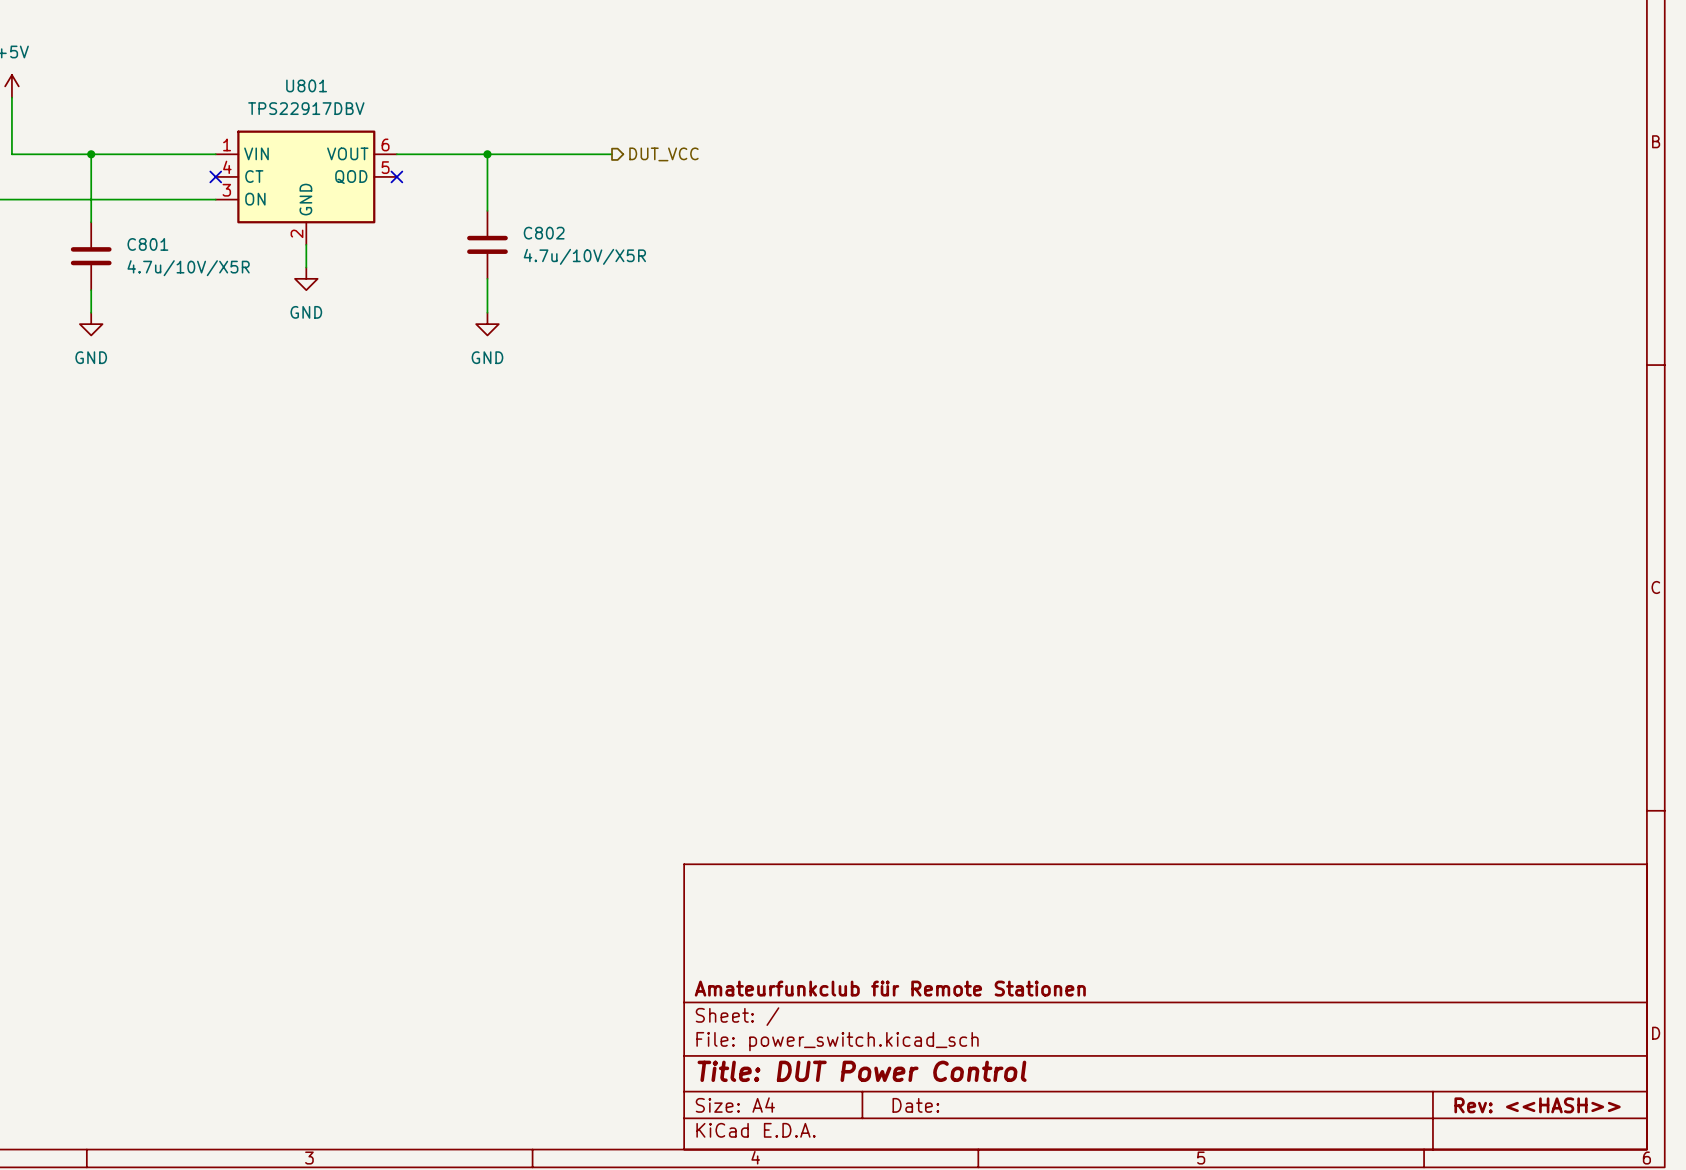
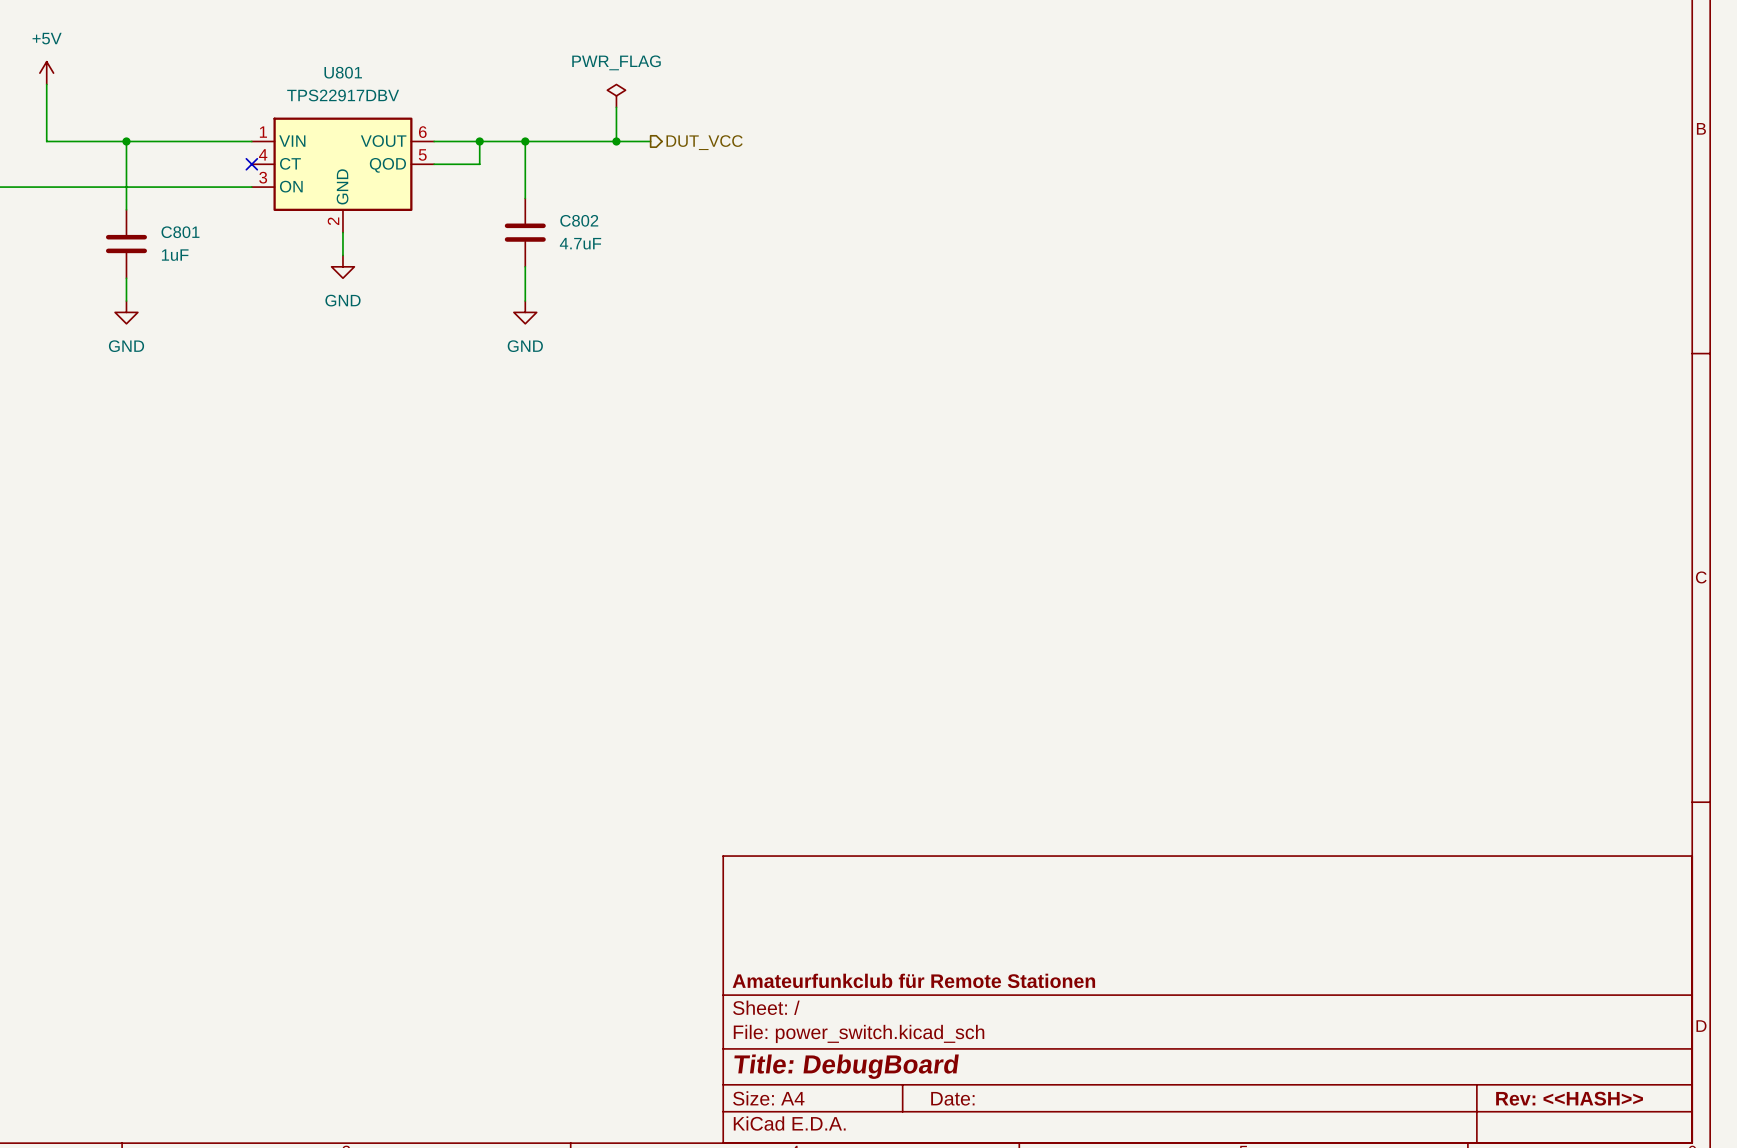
power symbol: none -> PWR_FLAG (616, 95)
wire: none -> (616, 107) (616, 141)
wire: none -> (479, 141) (479, 164) (434, 164)
junction: none -> (479, 141)
junction: none -> (616, 141)
no-connect mark: (396, 176) -> none
C802 value: 4.7u/10V/X5R (584, 256) -> 4.7uF (580, 243)
C801 value: 4.7u/10V/X5R (188, 268) -> 1uF (175, 255)
title block: Title: DUT Power Control (862, 1071) -> Title: DebugBoard (846, 1066)

